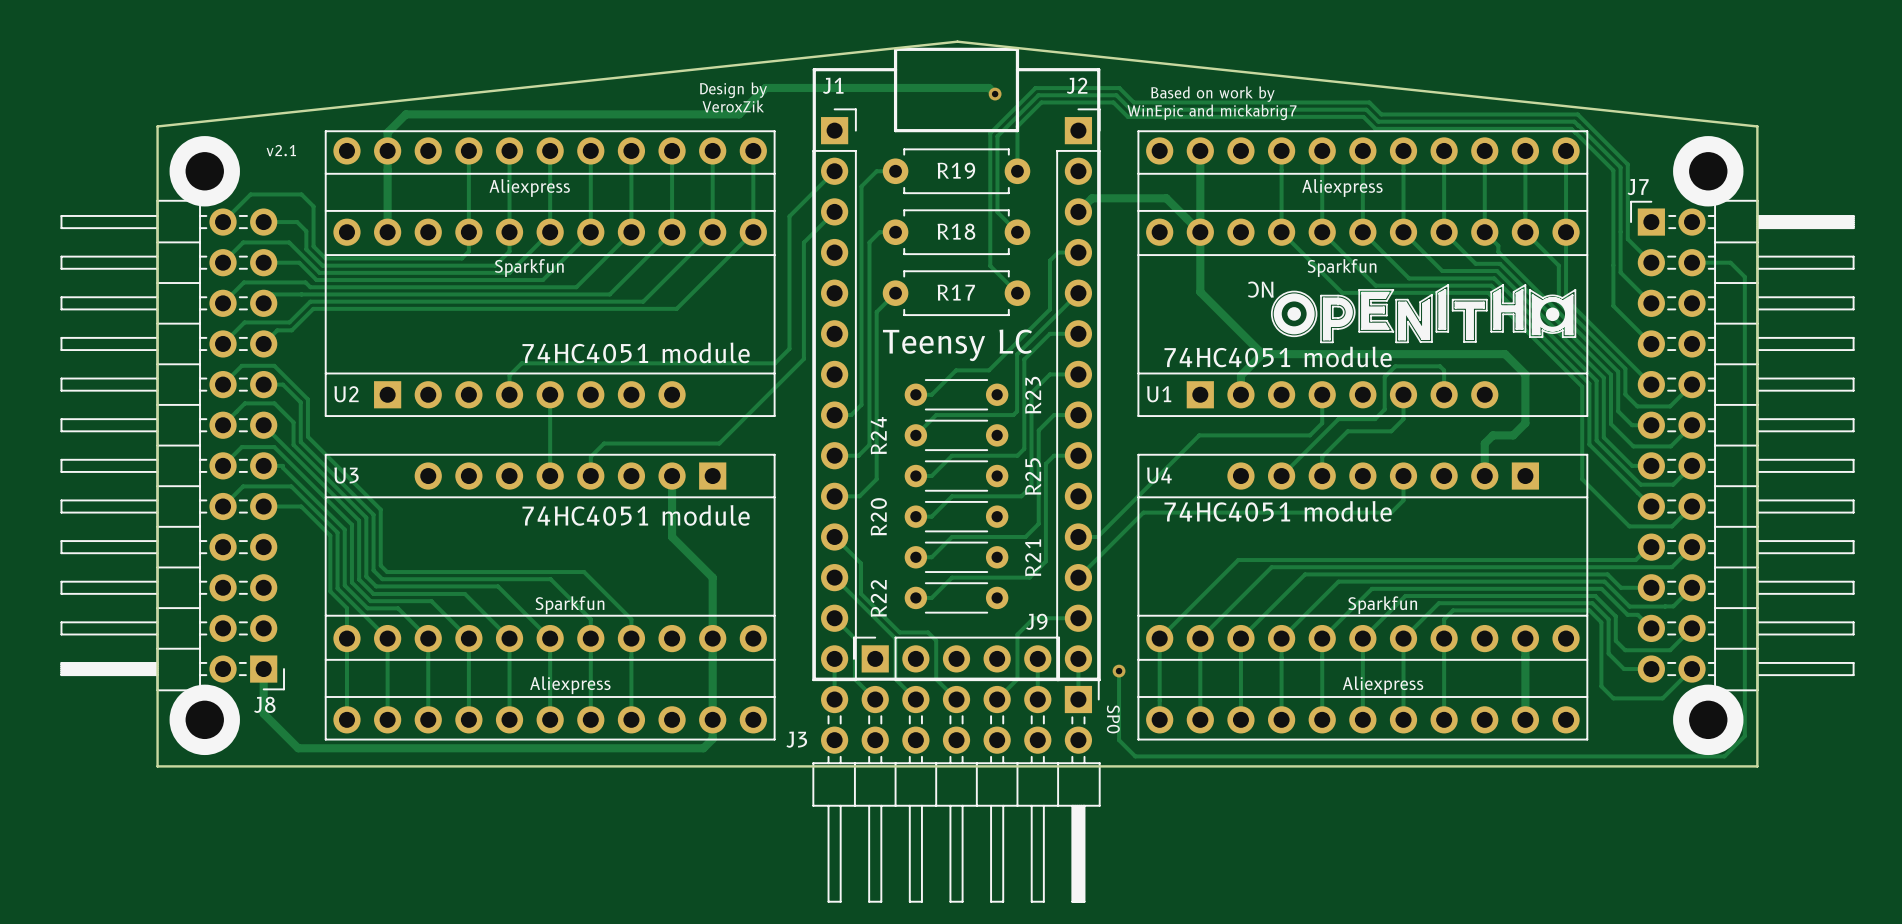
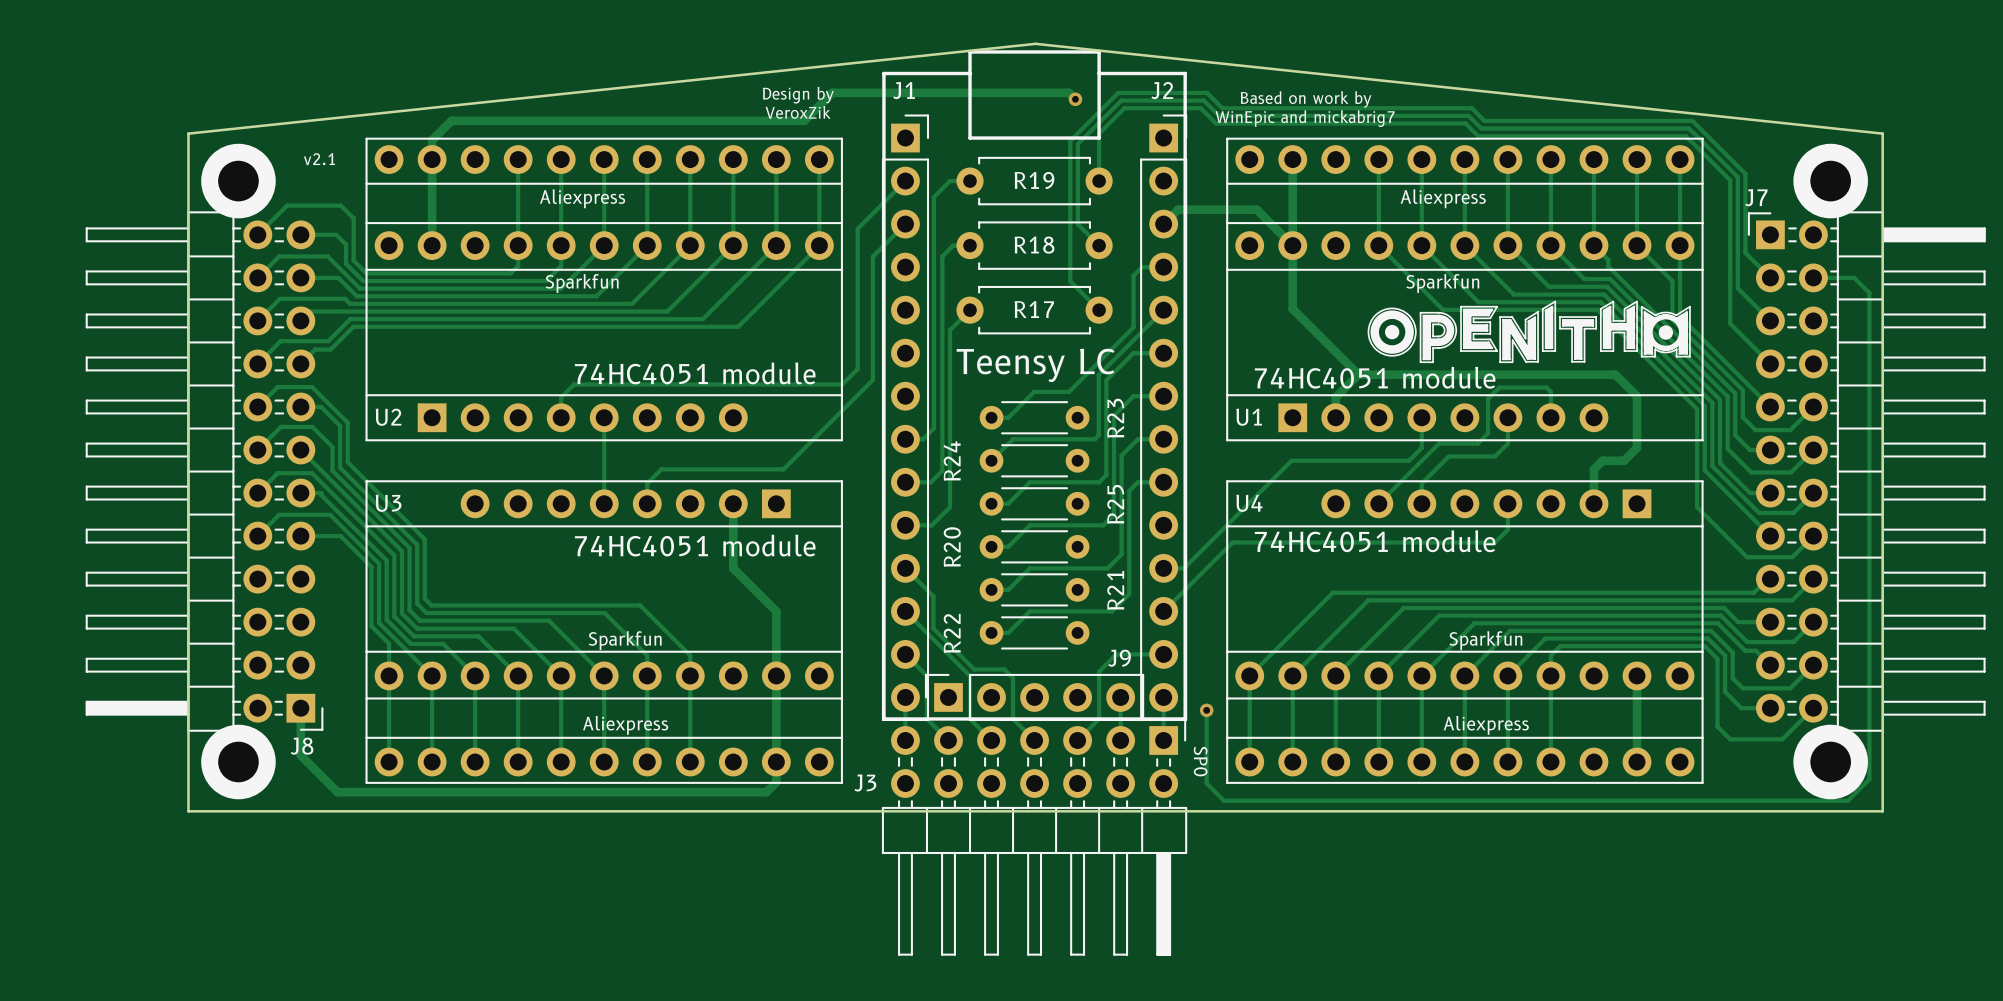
text: NC (1260, 289) -> none

